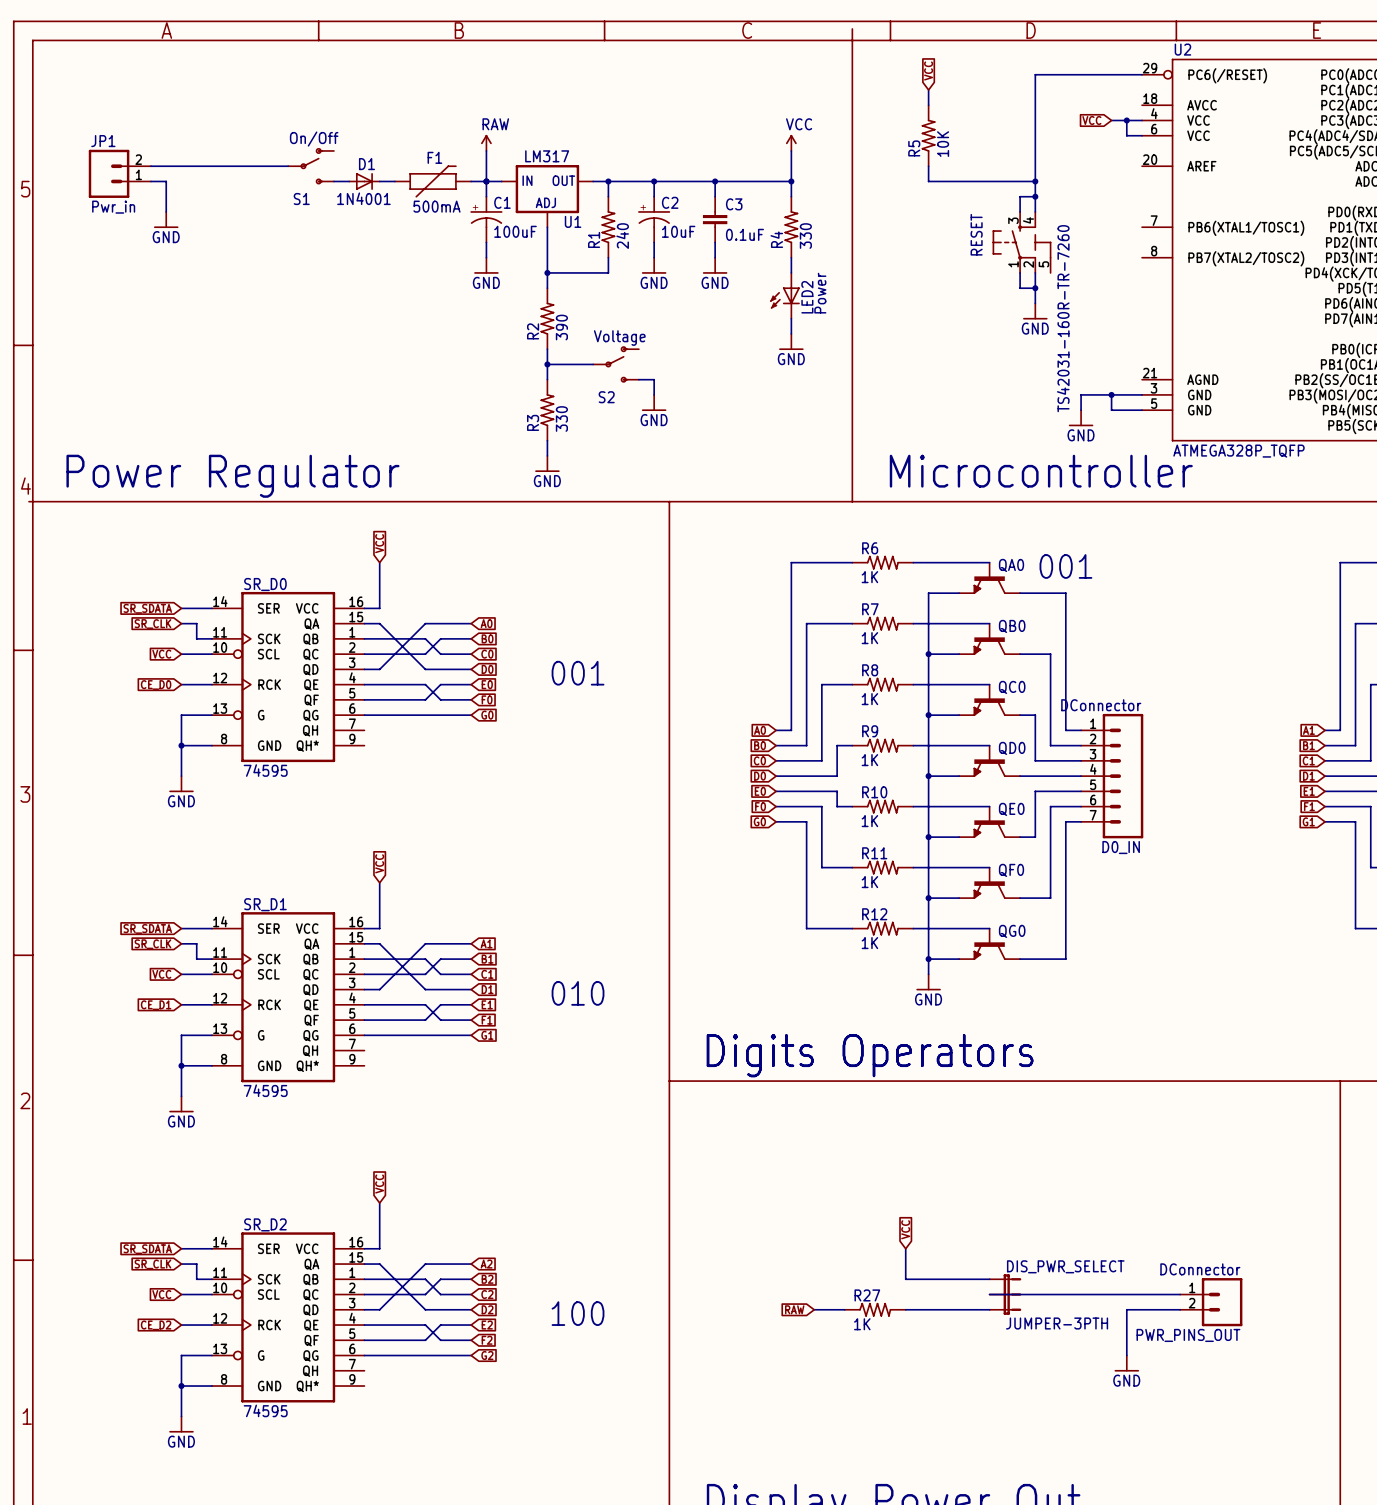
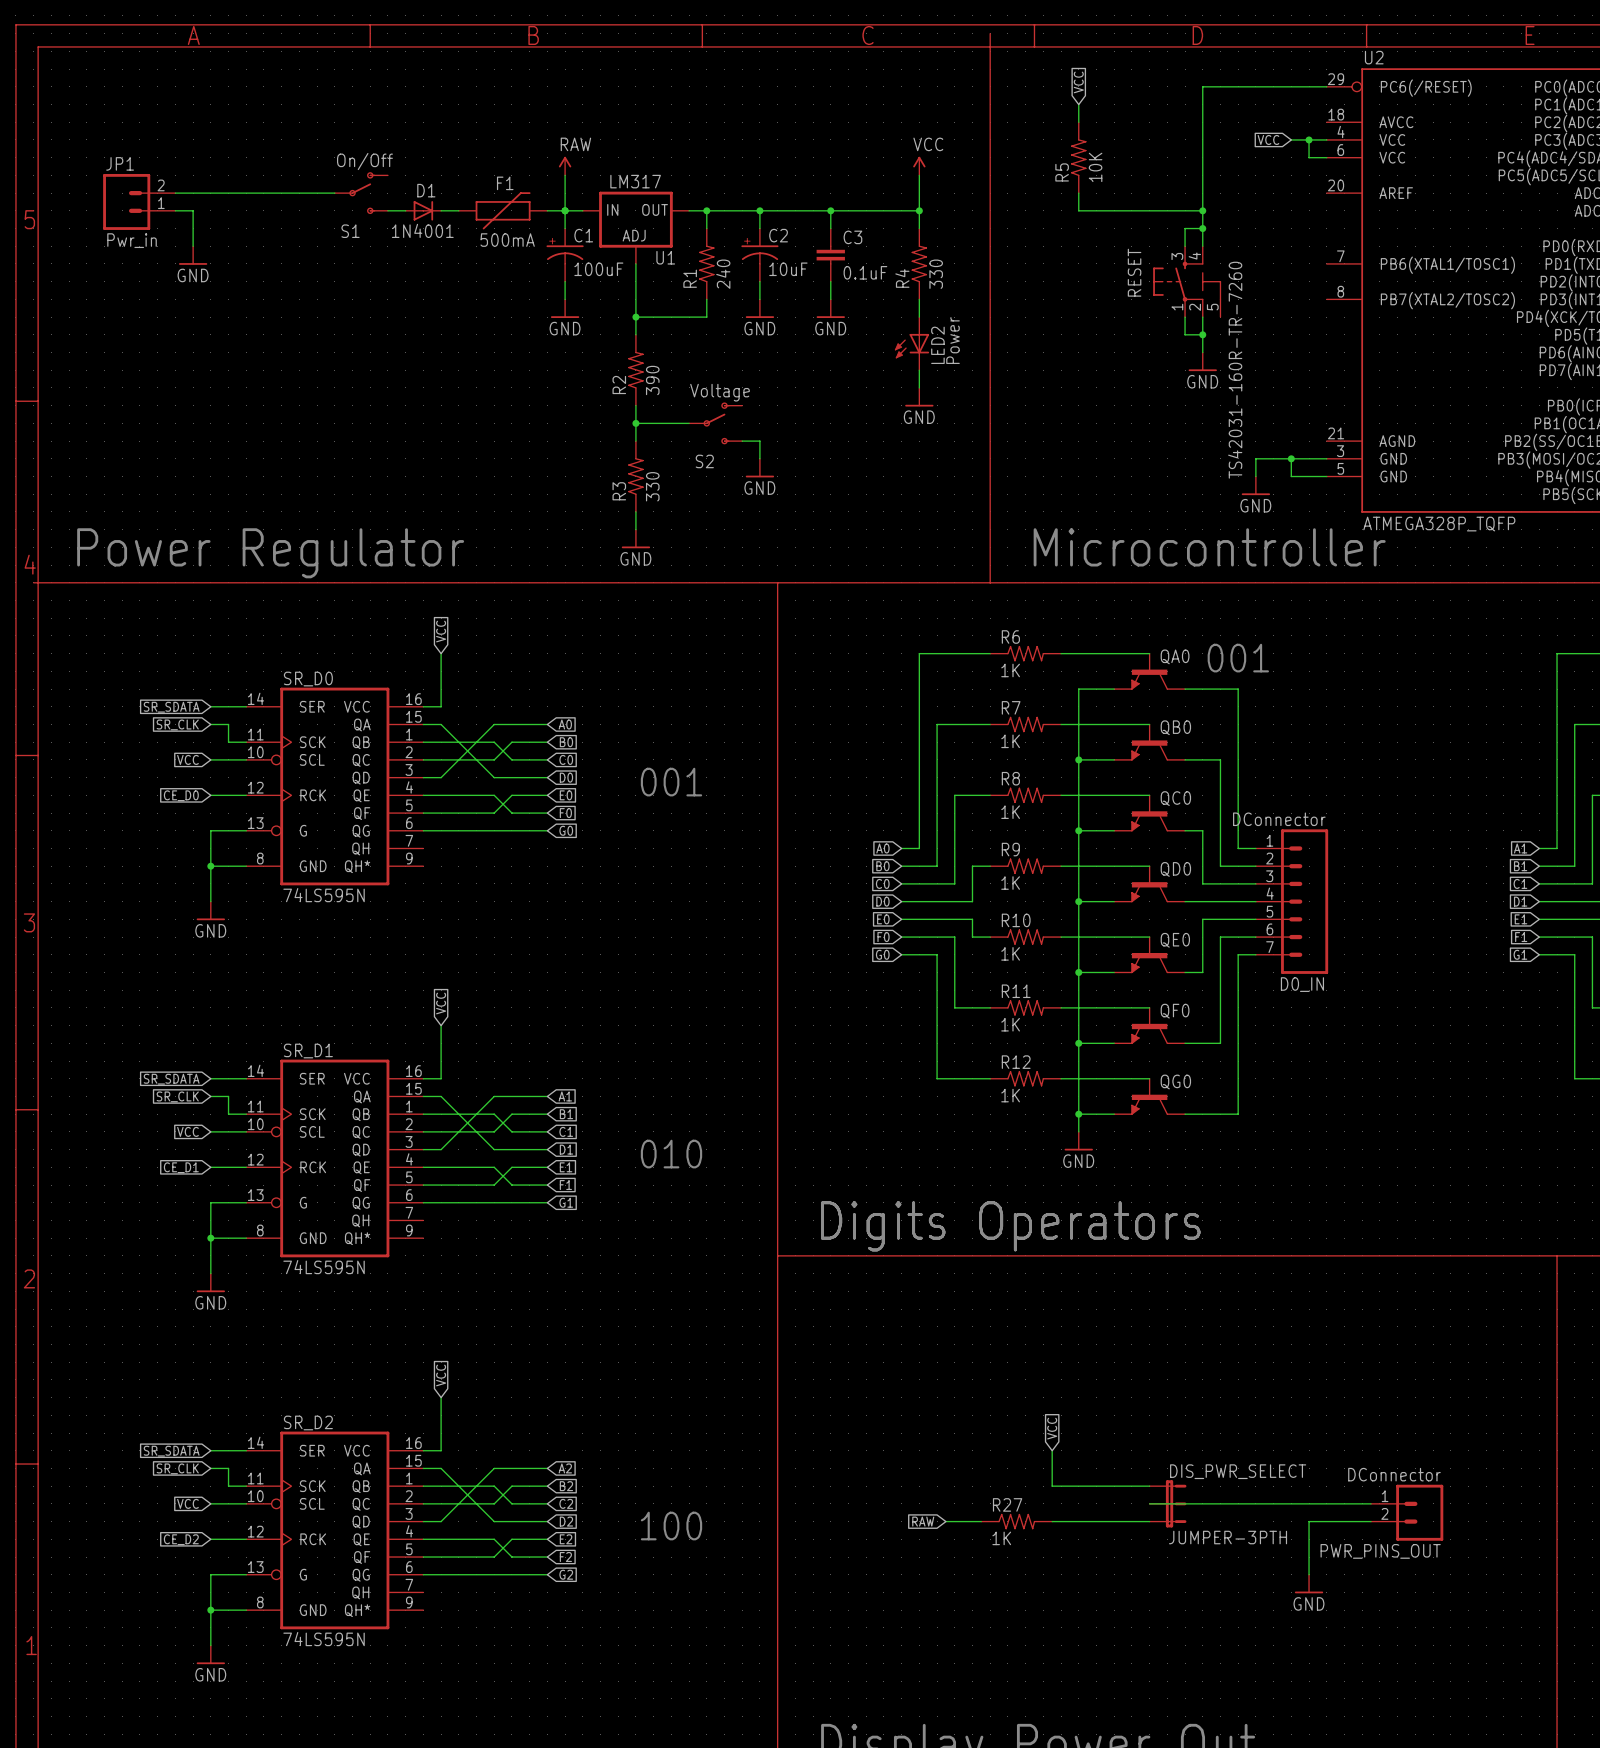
SR_D0 value: 74595 (265, 770) -> 74LS595N (324, 895)
SR_D1 value: 74595 (265, 1090) -> 74LS595N (324, 1267)
SR_D2 value: 74595 (265, 1410) -> 74LS595N (324, 1639)

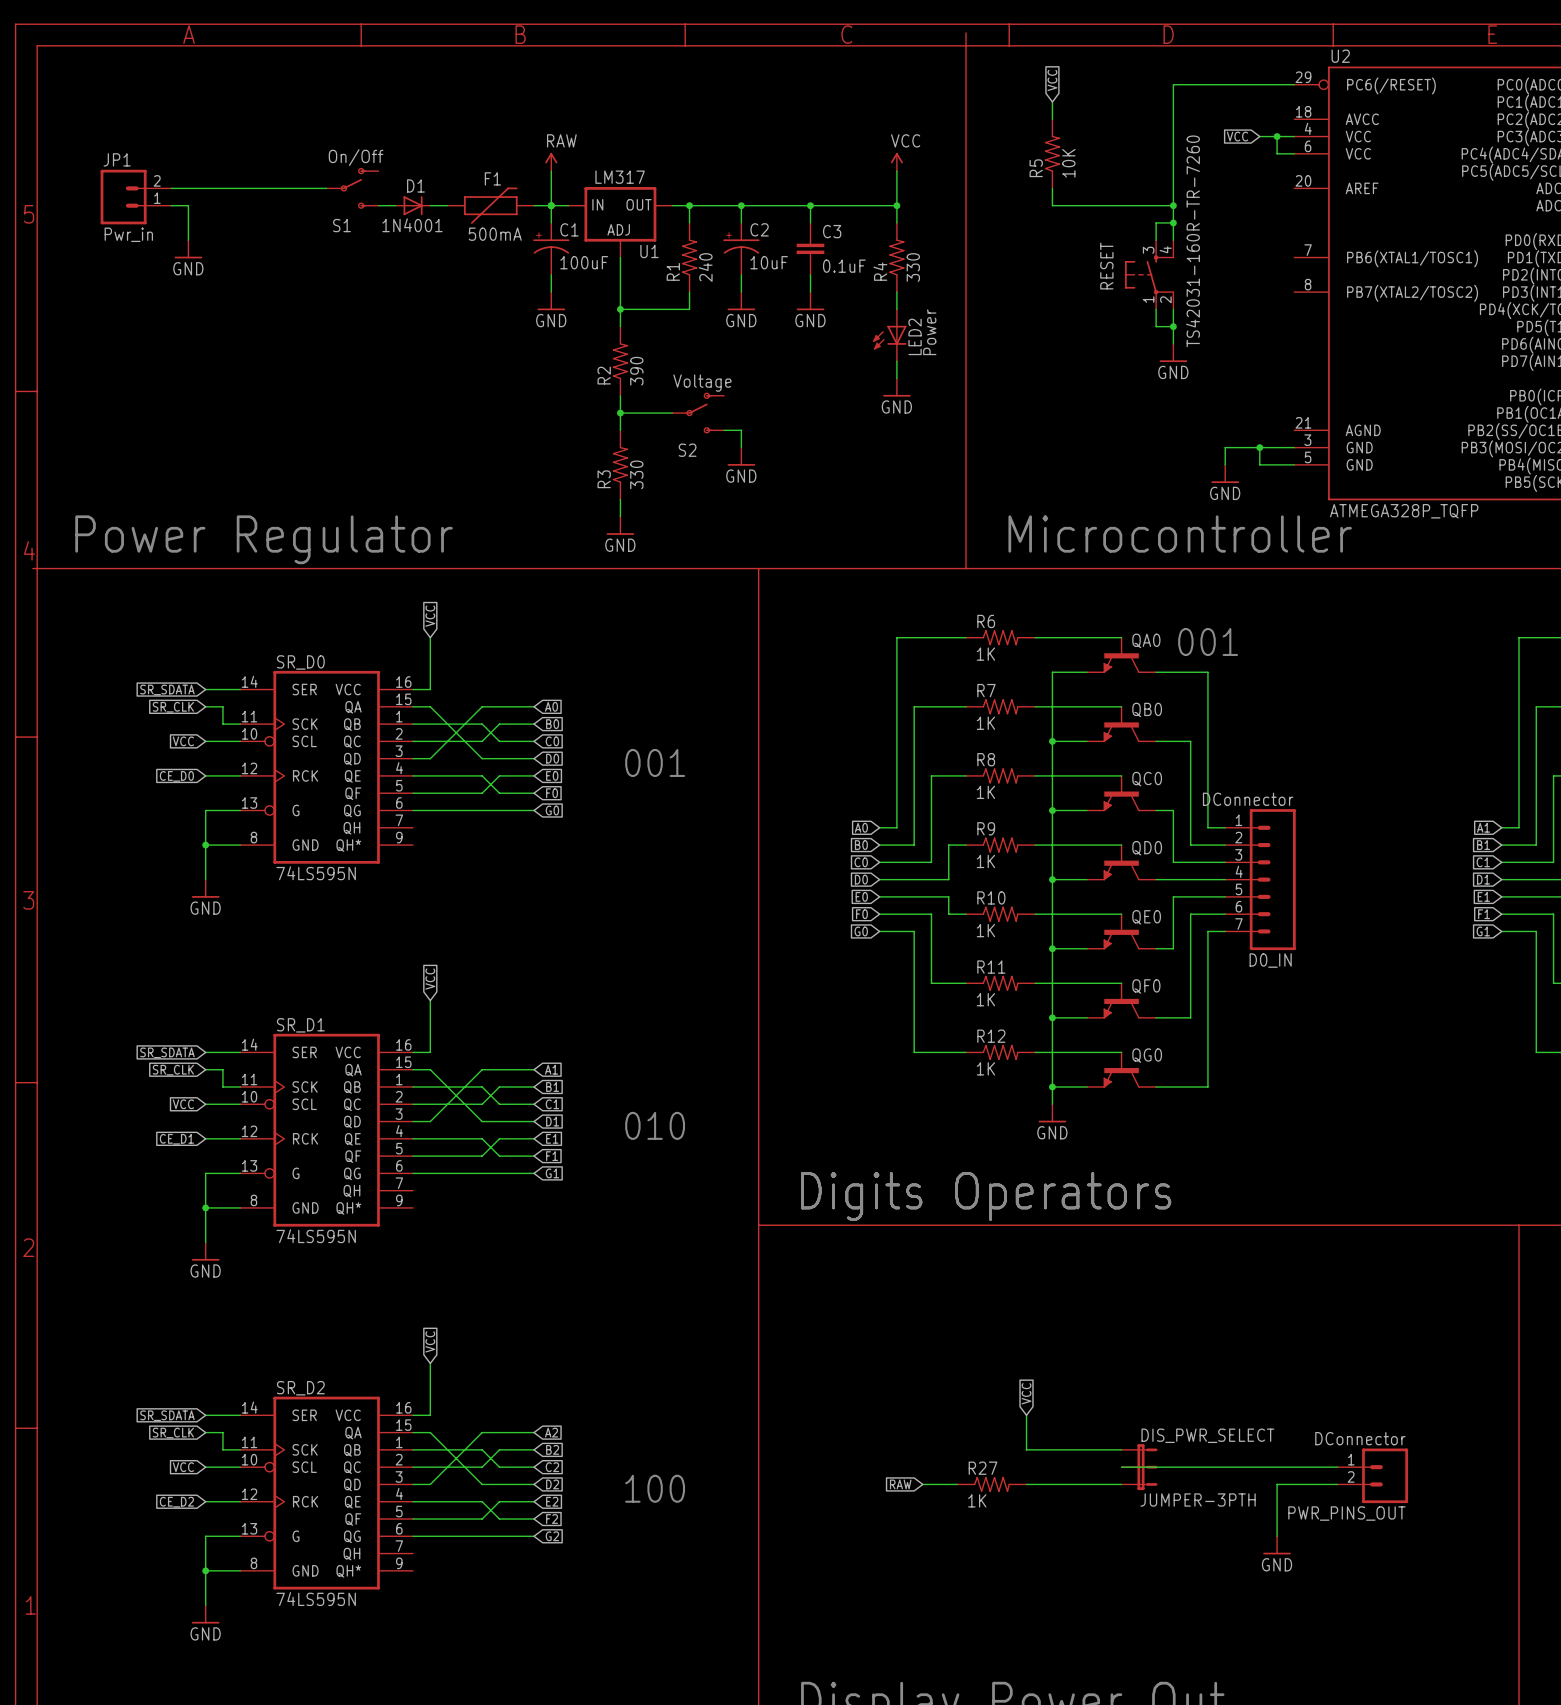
RESET: none -> TS42031-160R-TR-7260 (1149, 274)
RESET: TS42031-160R-TR-7260 (1187, 281) -> none

